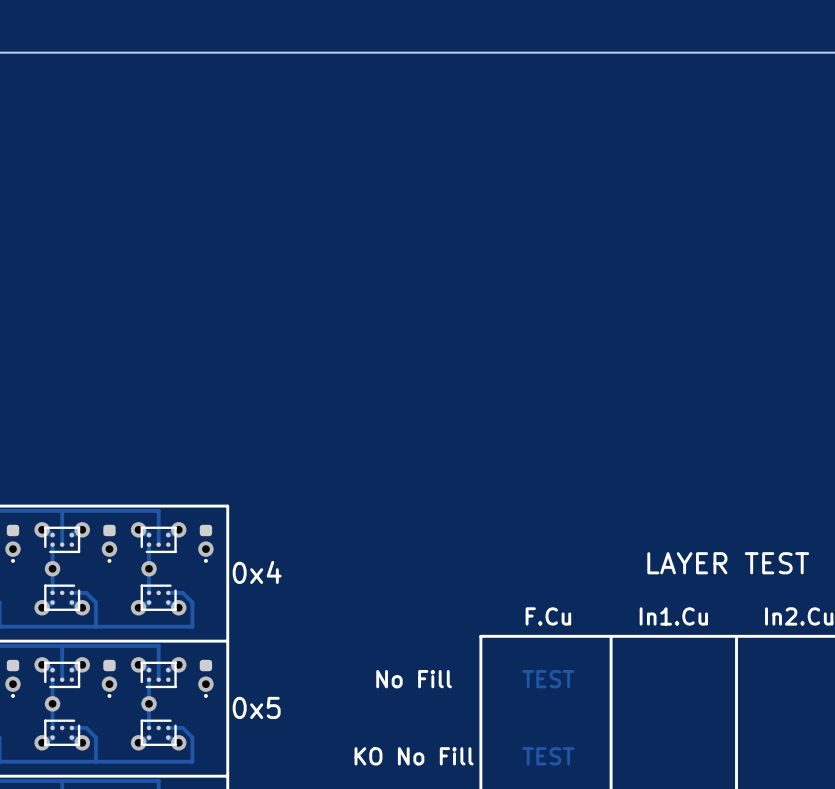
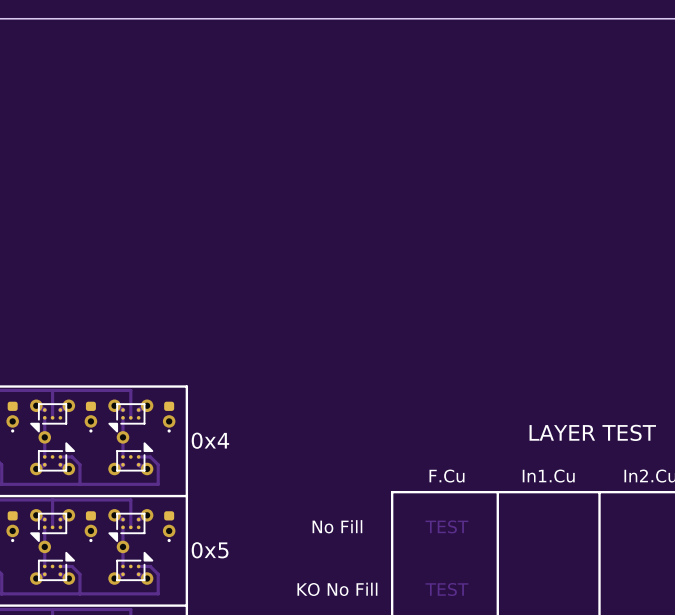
part footprint: [44, 526, 81, 554] -> [30, 403, 68, 433]
part footprint: [140, 526, 177, 554] -> [108, 403, 146, 433]
part footprint: [44, 584, 81, 611] -> [37, 442, 76, 472]
part footprint: [140, 584, 177, 611] -> [116, 442, 154, 472]
part footprint: [44, 661, 81, 689] -> [30, 512, 68, 542]
part footprint: [140, 661, 177, 689] -> [108, 512, 146, 542]
part footprint: [44, 719, 81, 747] -> [37, 551, 76, 582]
part footprint: [140, 719, 177, 747] -> [116, 551, 154, 582]

